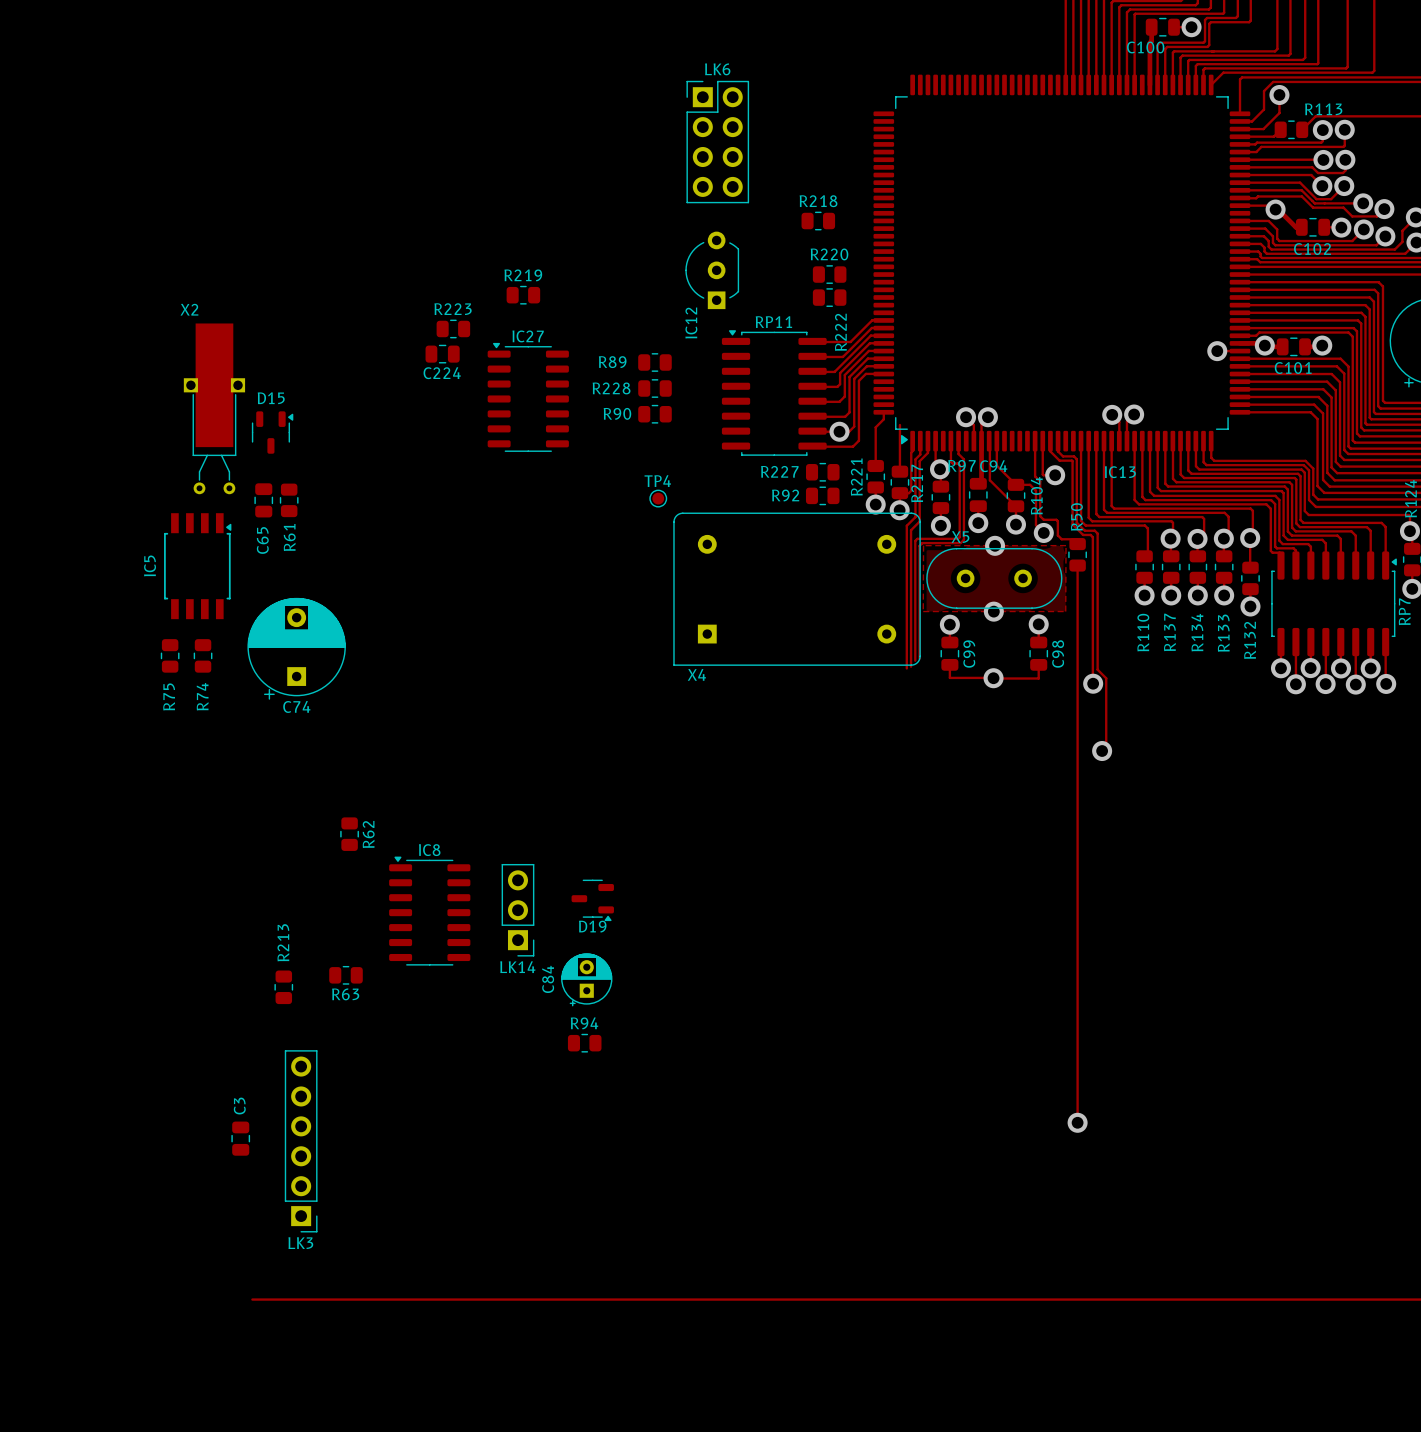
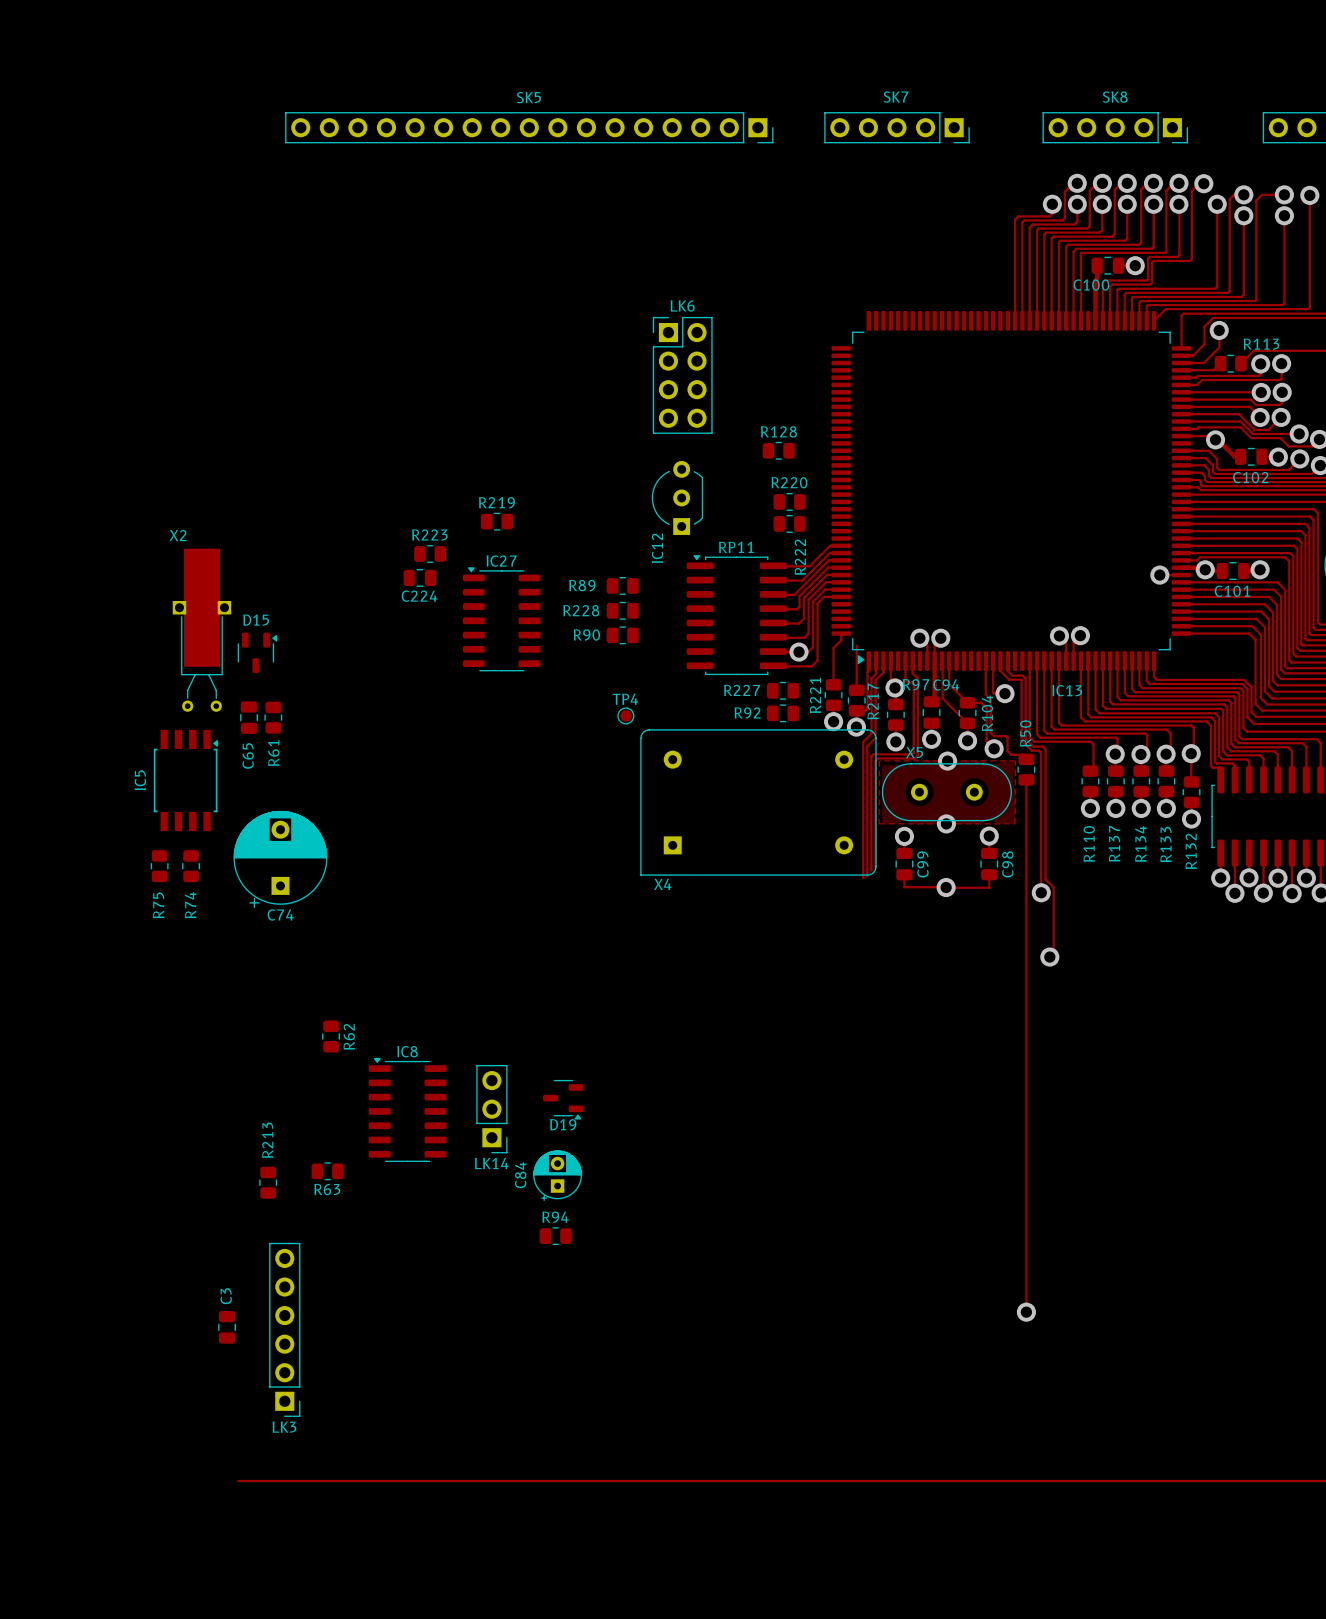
R218 name: R218 (818, 201) -> R128 (778, 431)

